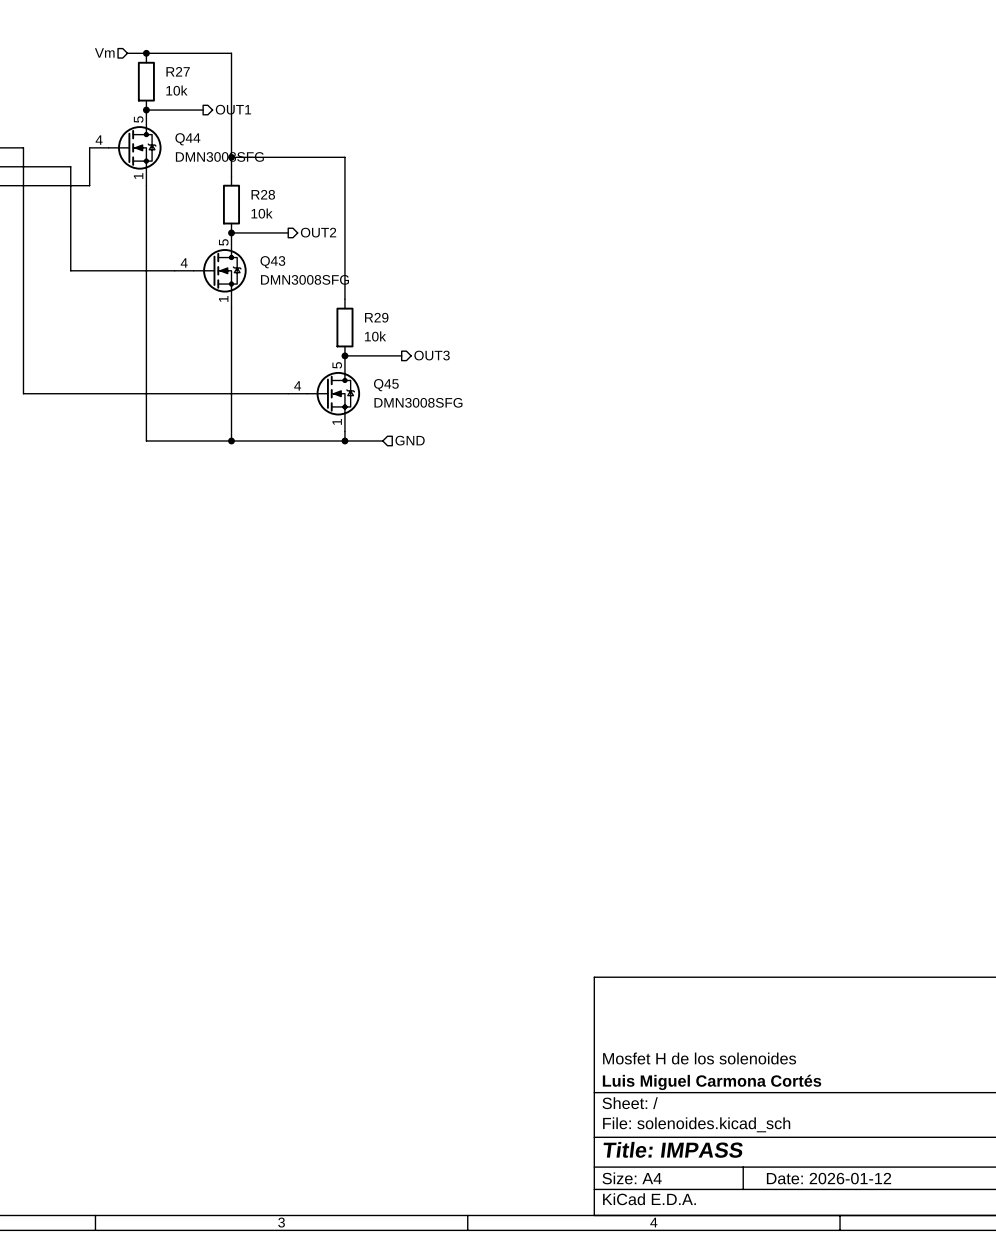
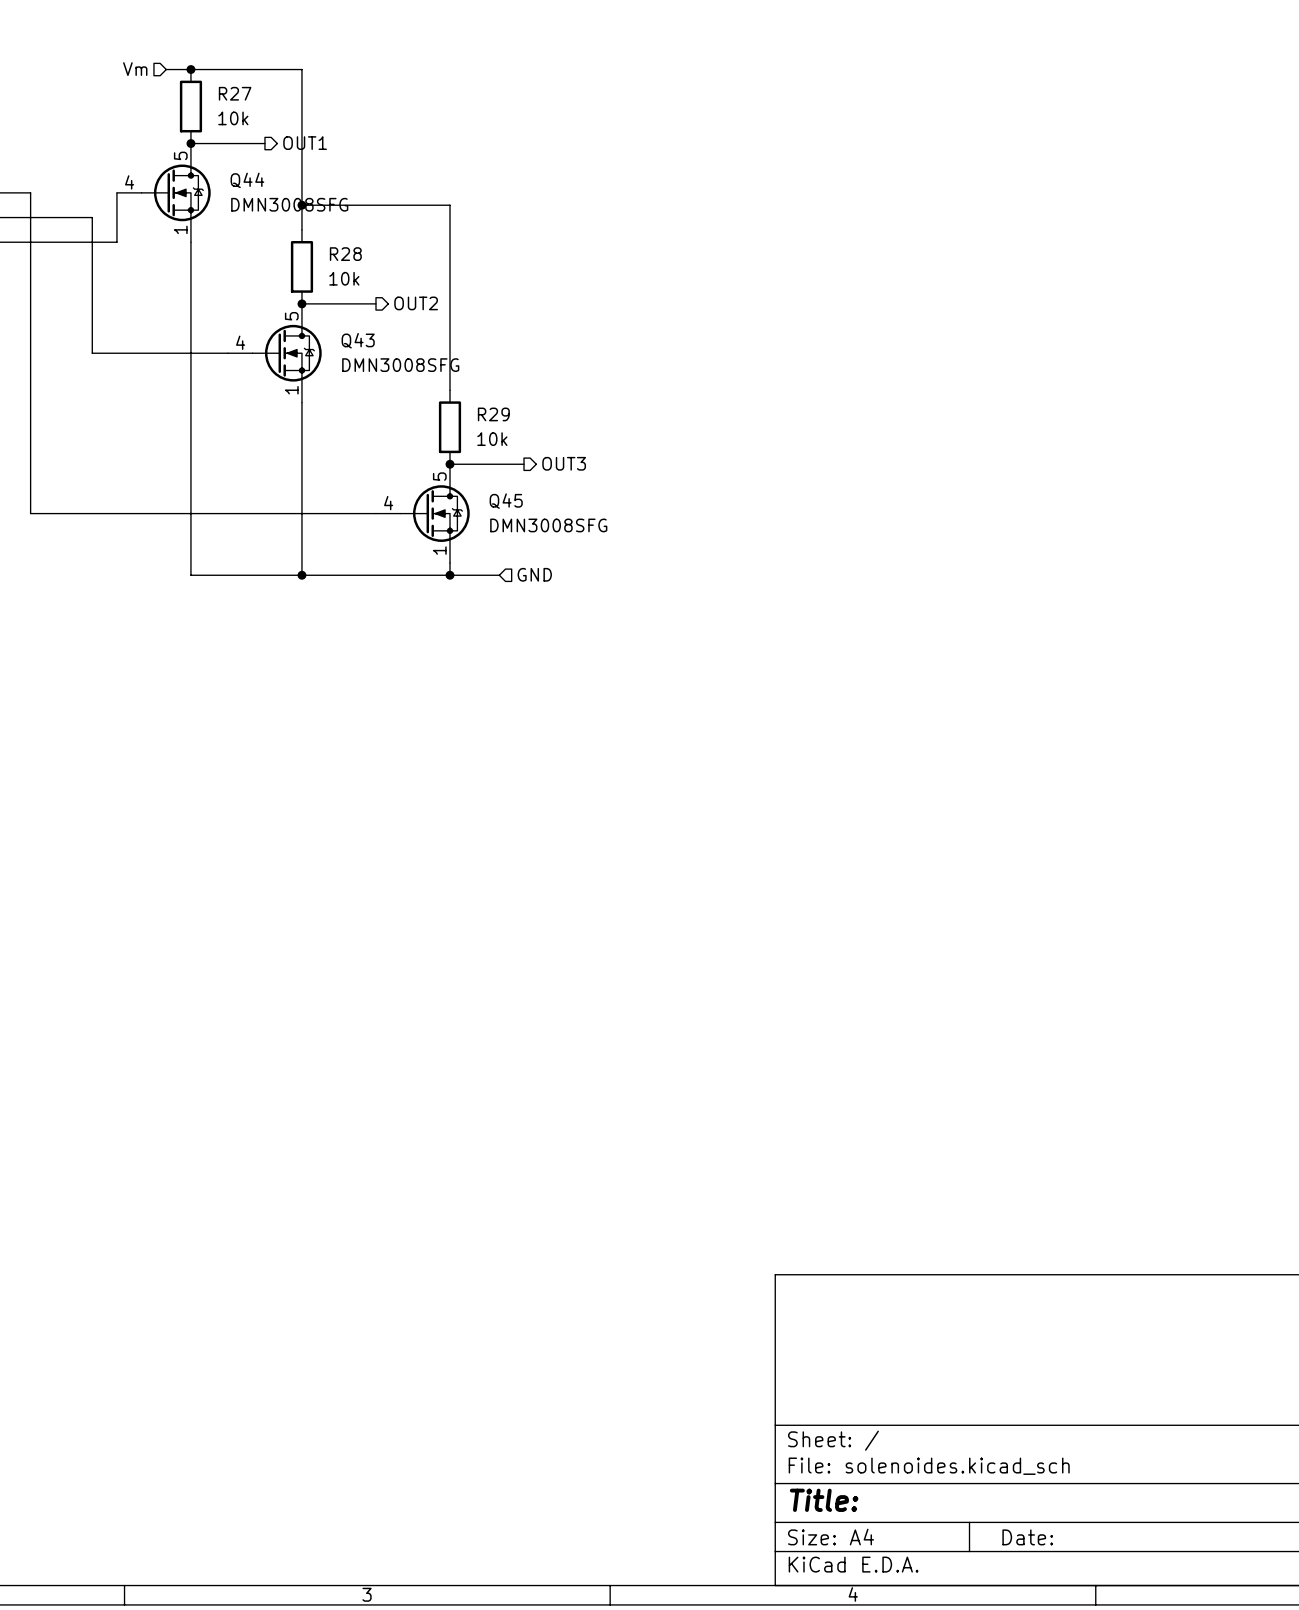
title block: Mosfet H de los solenoides (699, 1058) -> none
title block: Luis Miguel Carmona Cortés (712, 1082) -> none
title block: Title: IMPASS (673, 1149) -> Title: (824, 1500)
title block: Date: 2026-01-12 (829, 1178) -> Date: (1027, 1537)

